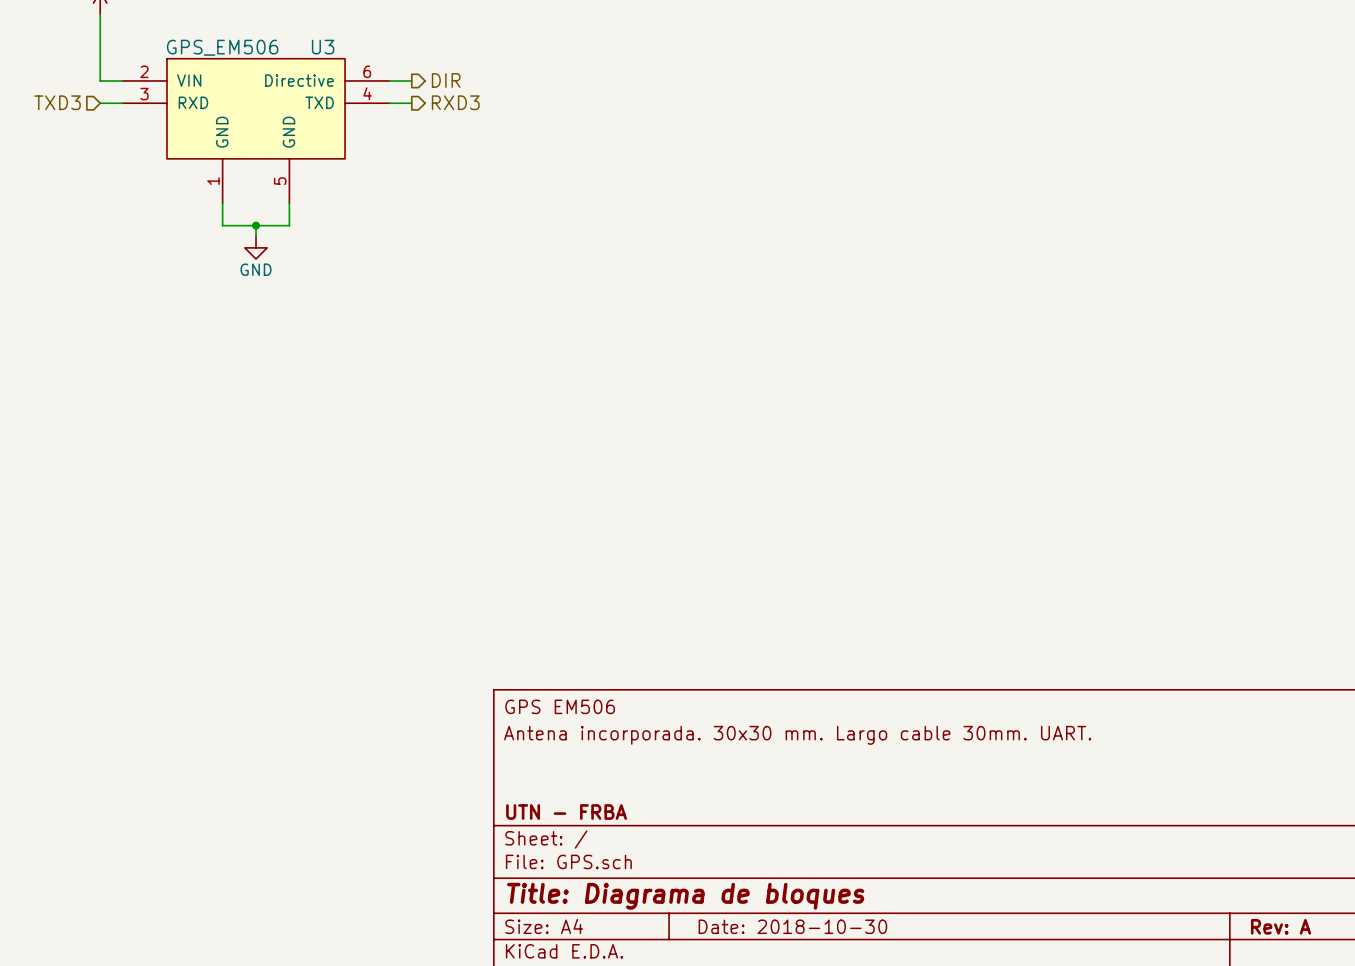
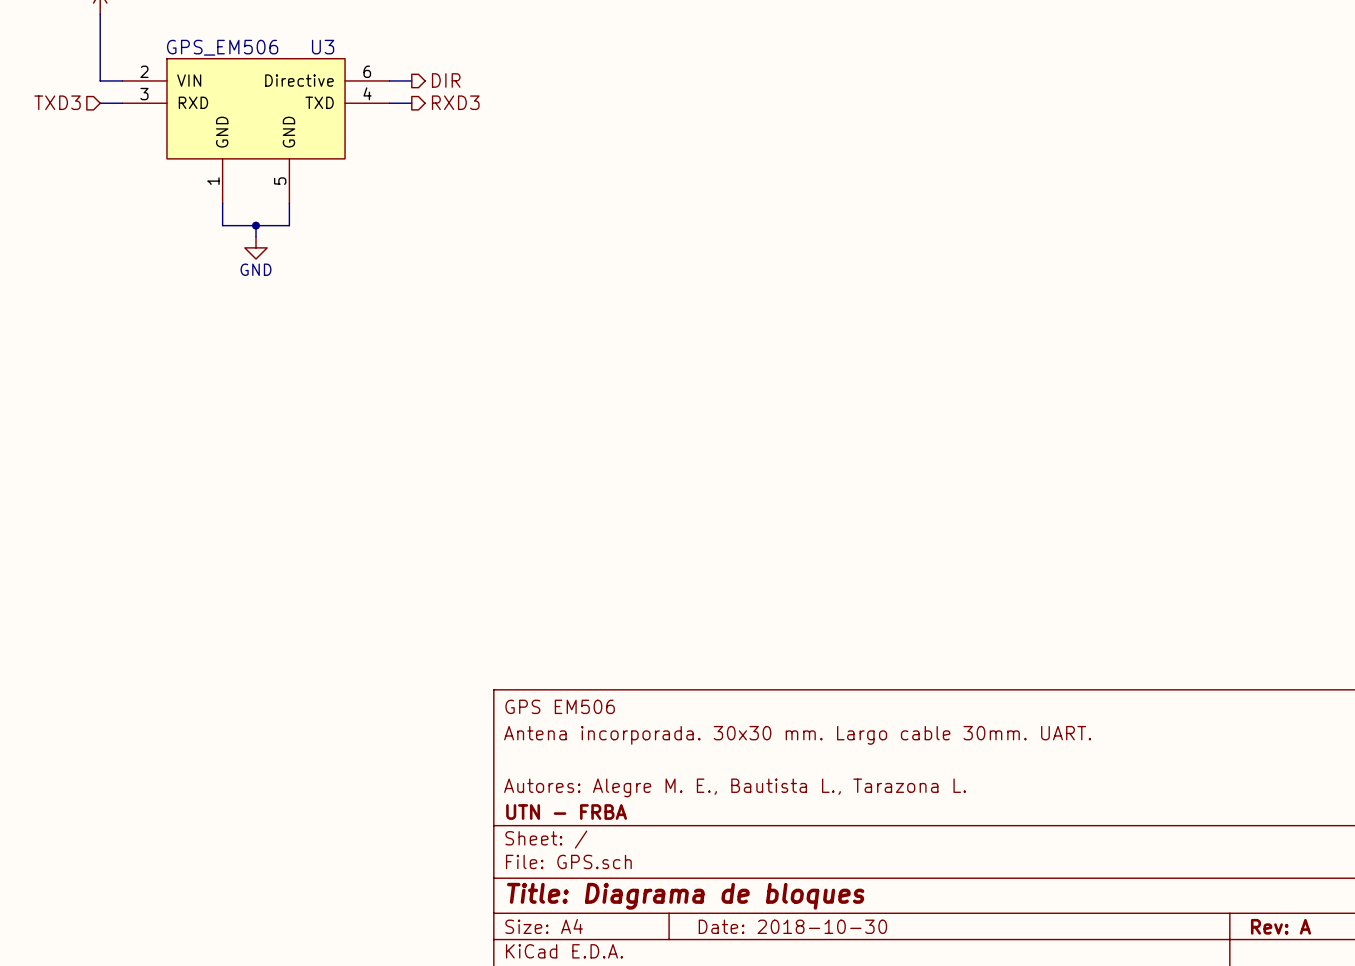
title block: none -> Autores: Alegre M. E., Bautista L., Tarazona L. (735, 787)

